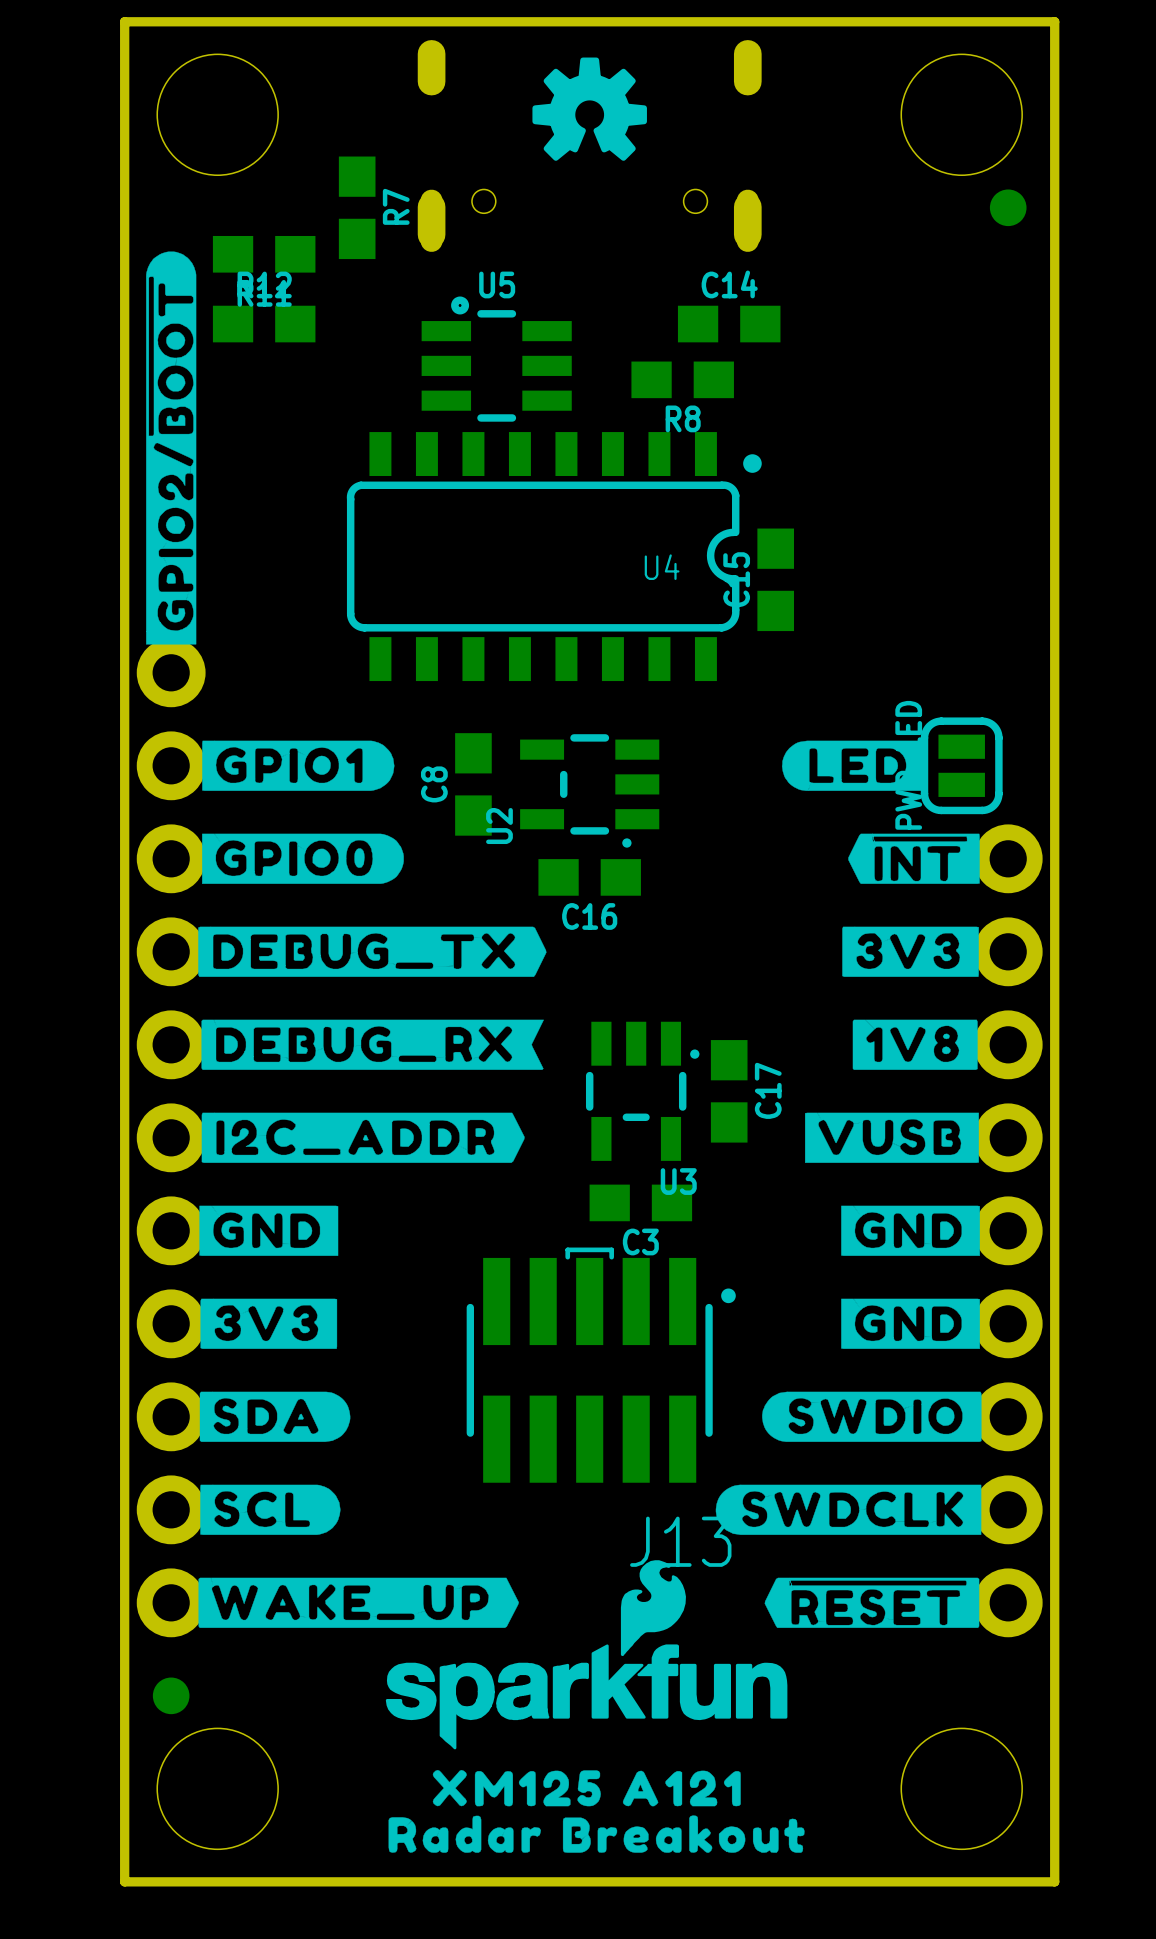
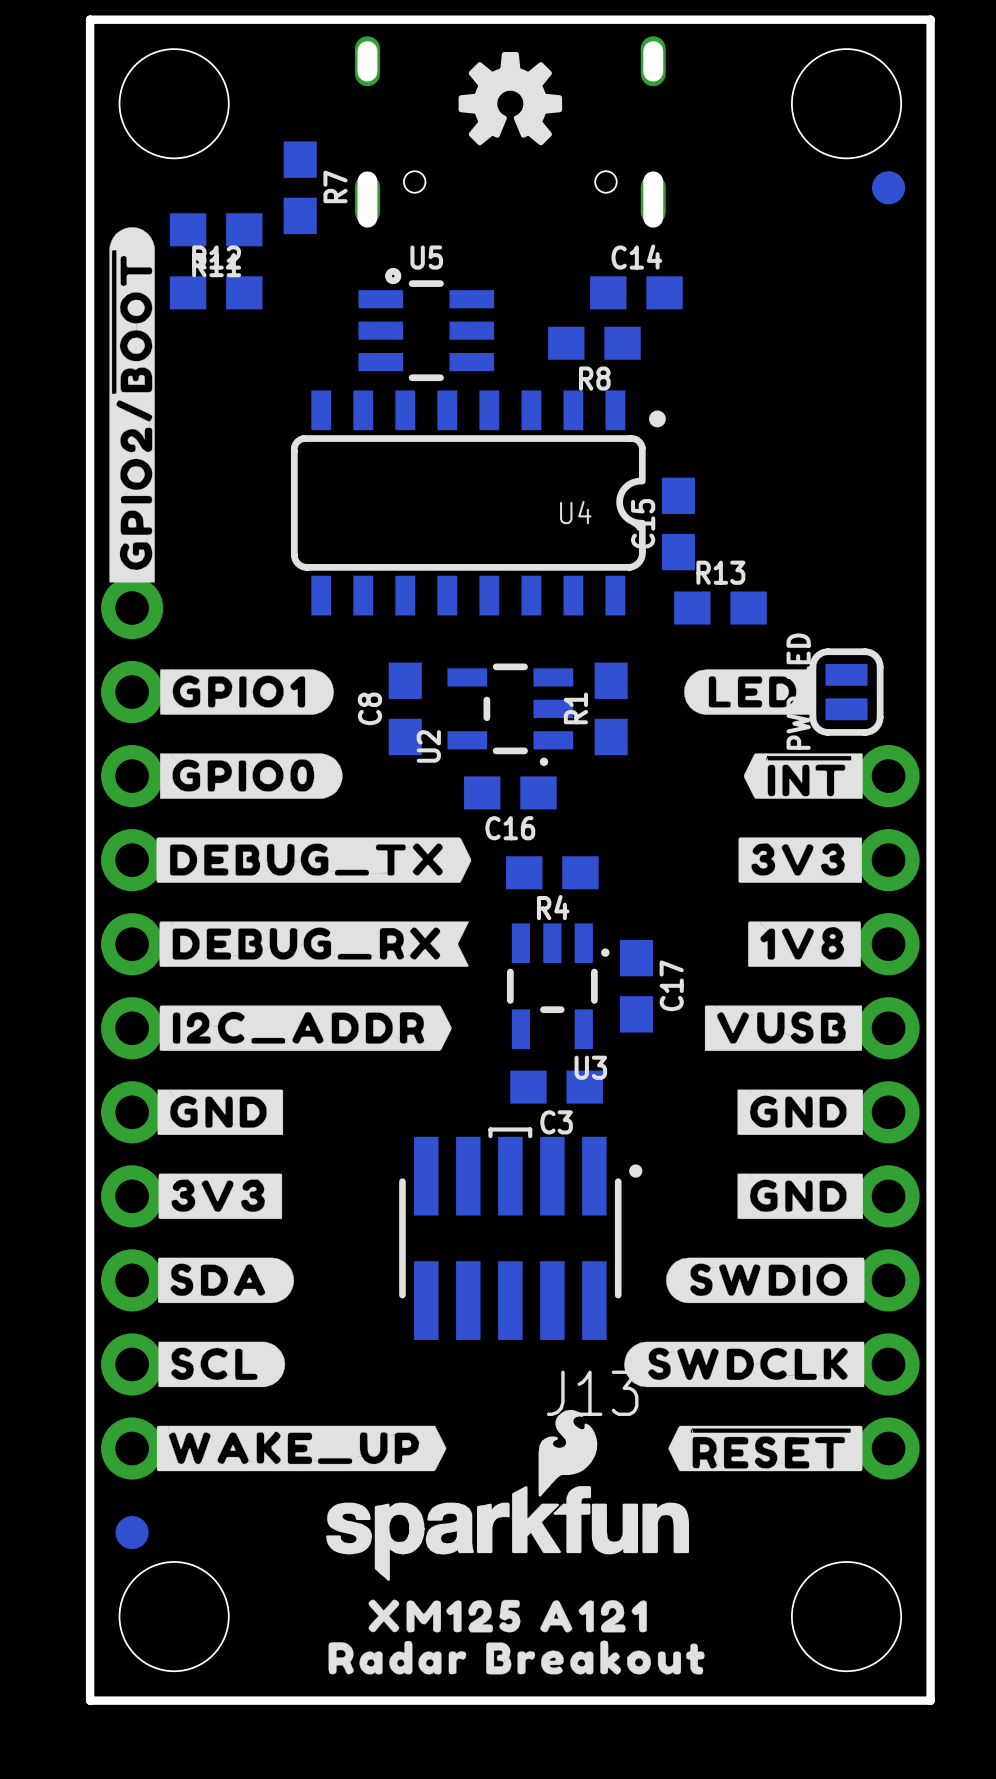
R13: none -> (720, 608)
R1: none -> (611, 708)
R4: none -> (552, 872)

